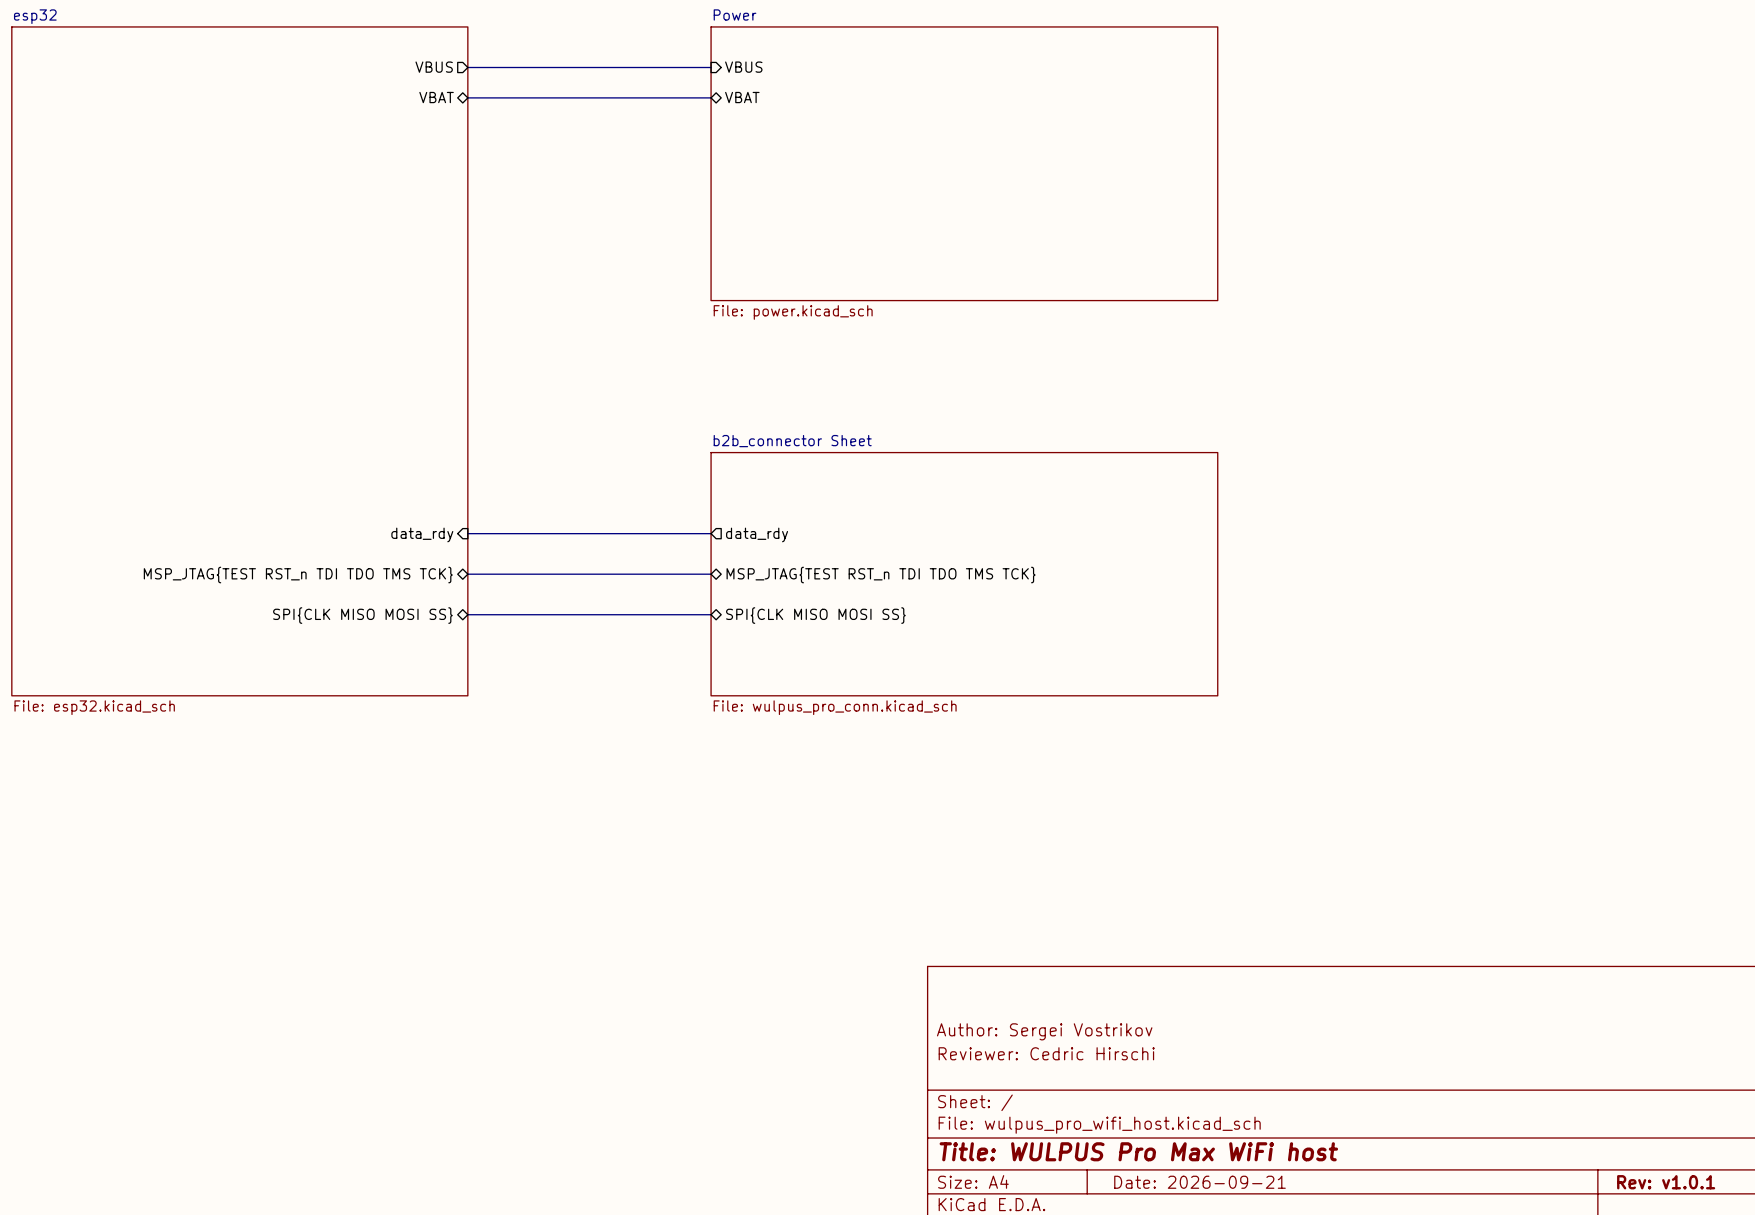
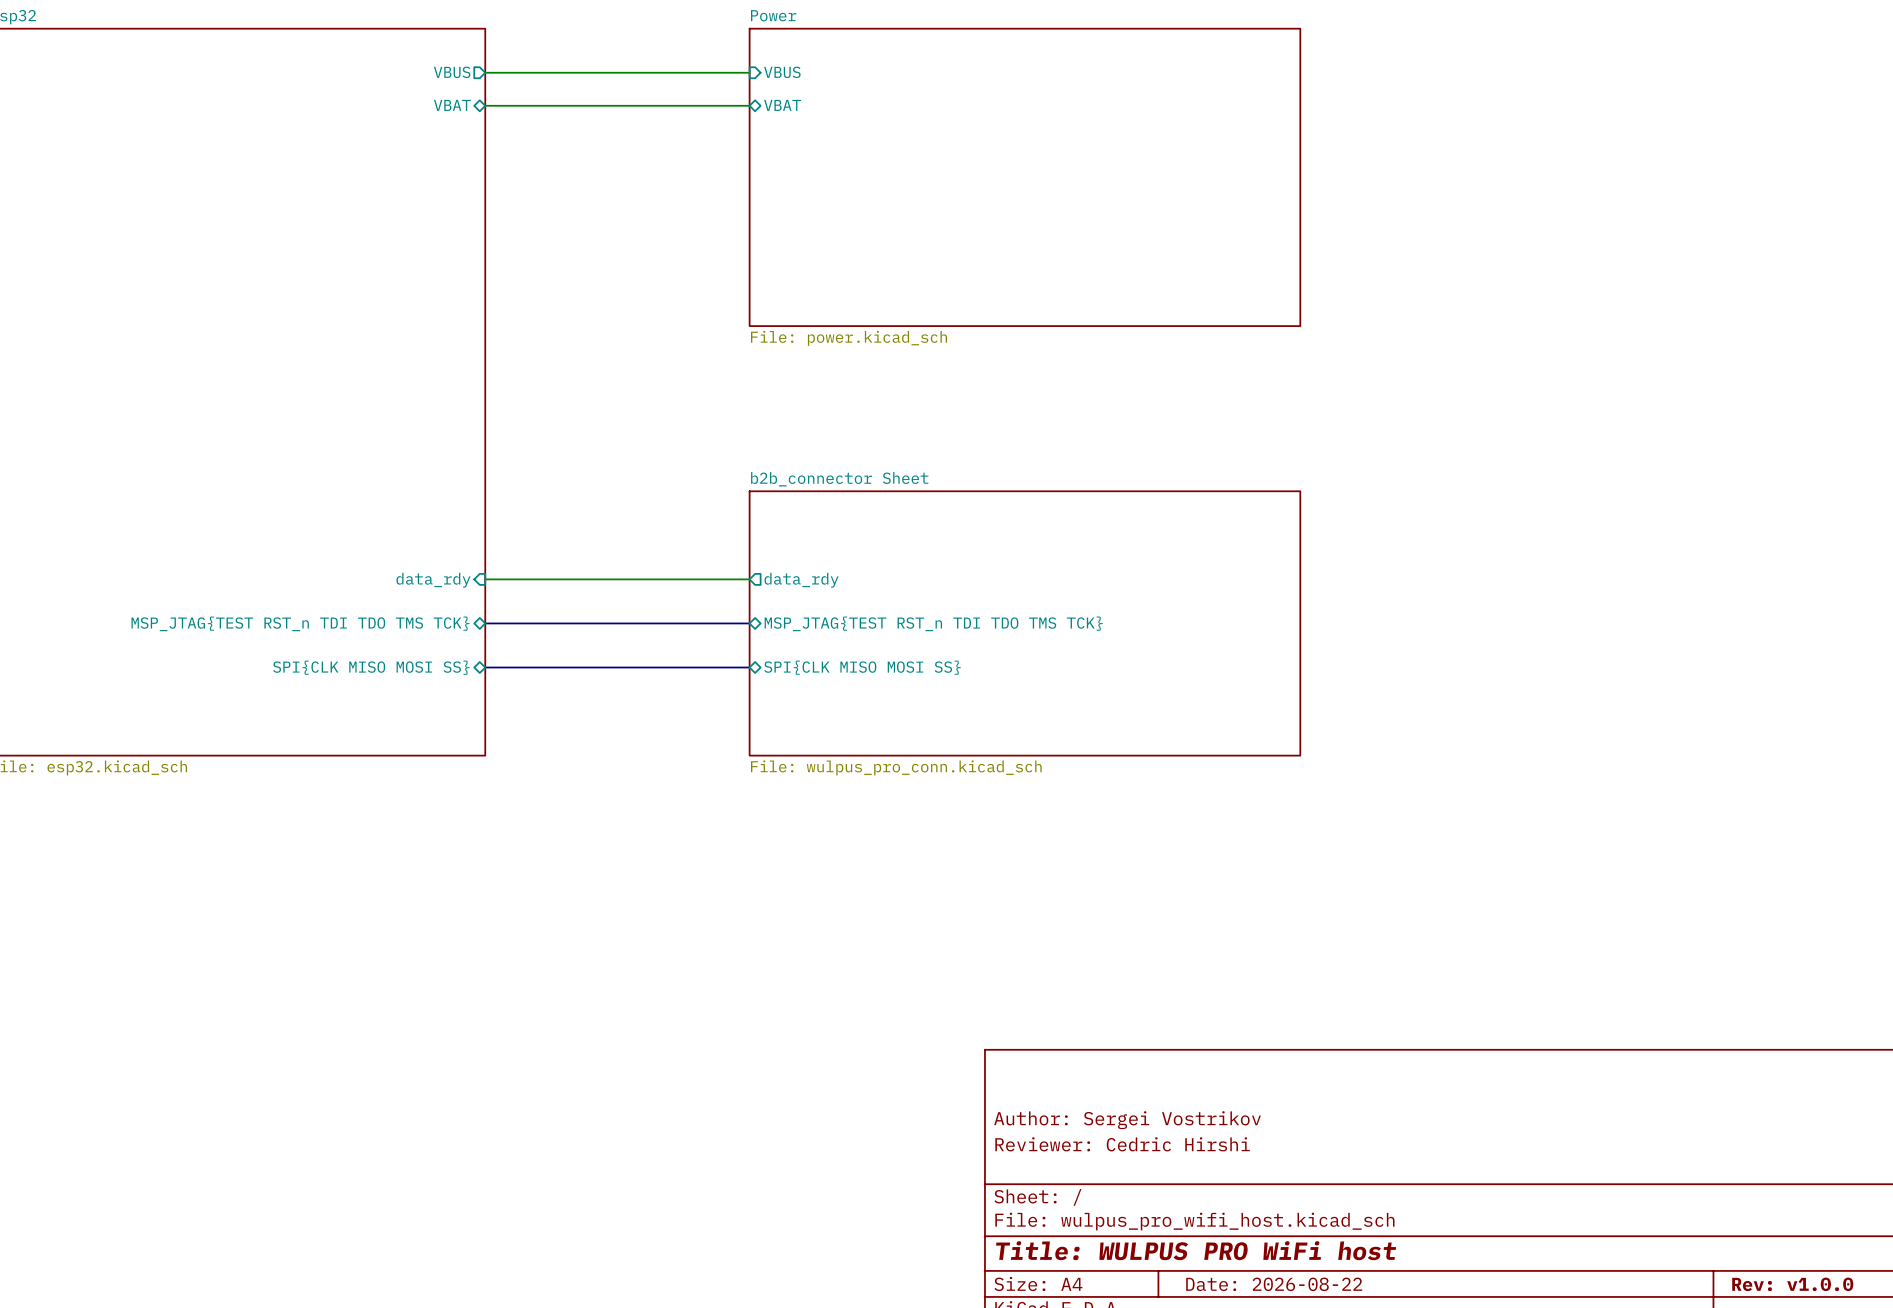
title block: Reviewer: Cedric Hirschi (1046, 1053) -> Reviewer: Cedric Hirshi (1122, 1144)
title block: Title: WULPUS Pro Max WiFi host (1138, 1151) -> Title: WULPUS PRO WiFi host (1196, 1250)
title block: Date: 2026-09-21 (1200, 1182) -> Date: 2026-08-22 (1274, 1284)
title block: Rev: v1.0.1 (1666, 1182) -> Rev: v1.0.0 (1792, 1284)

